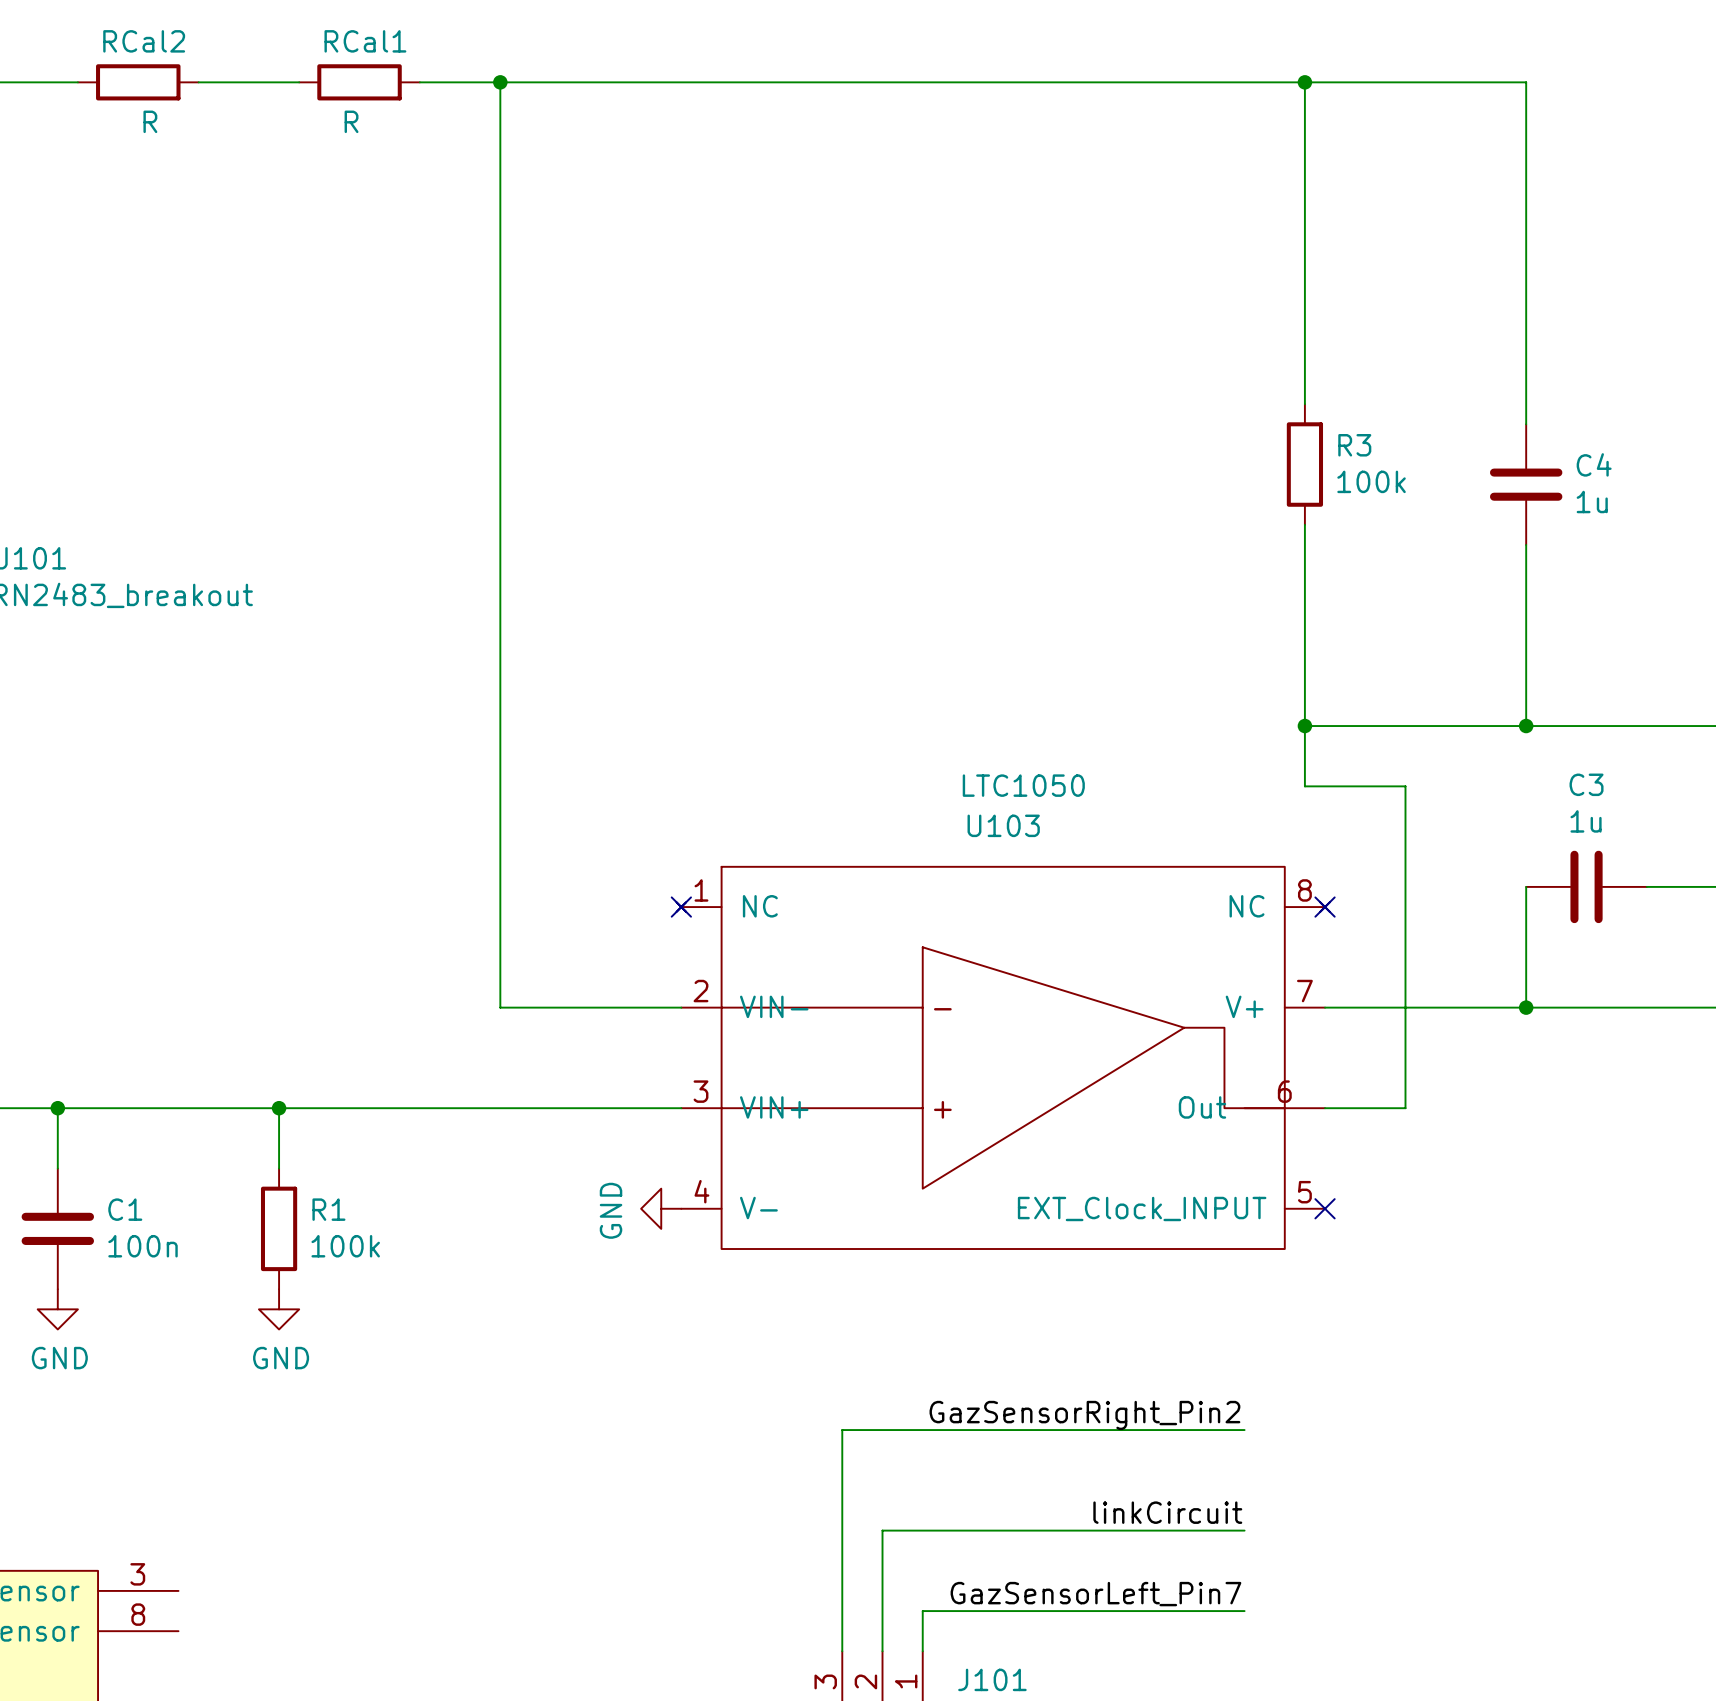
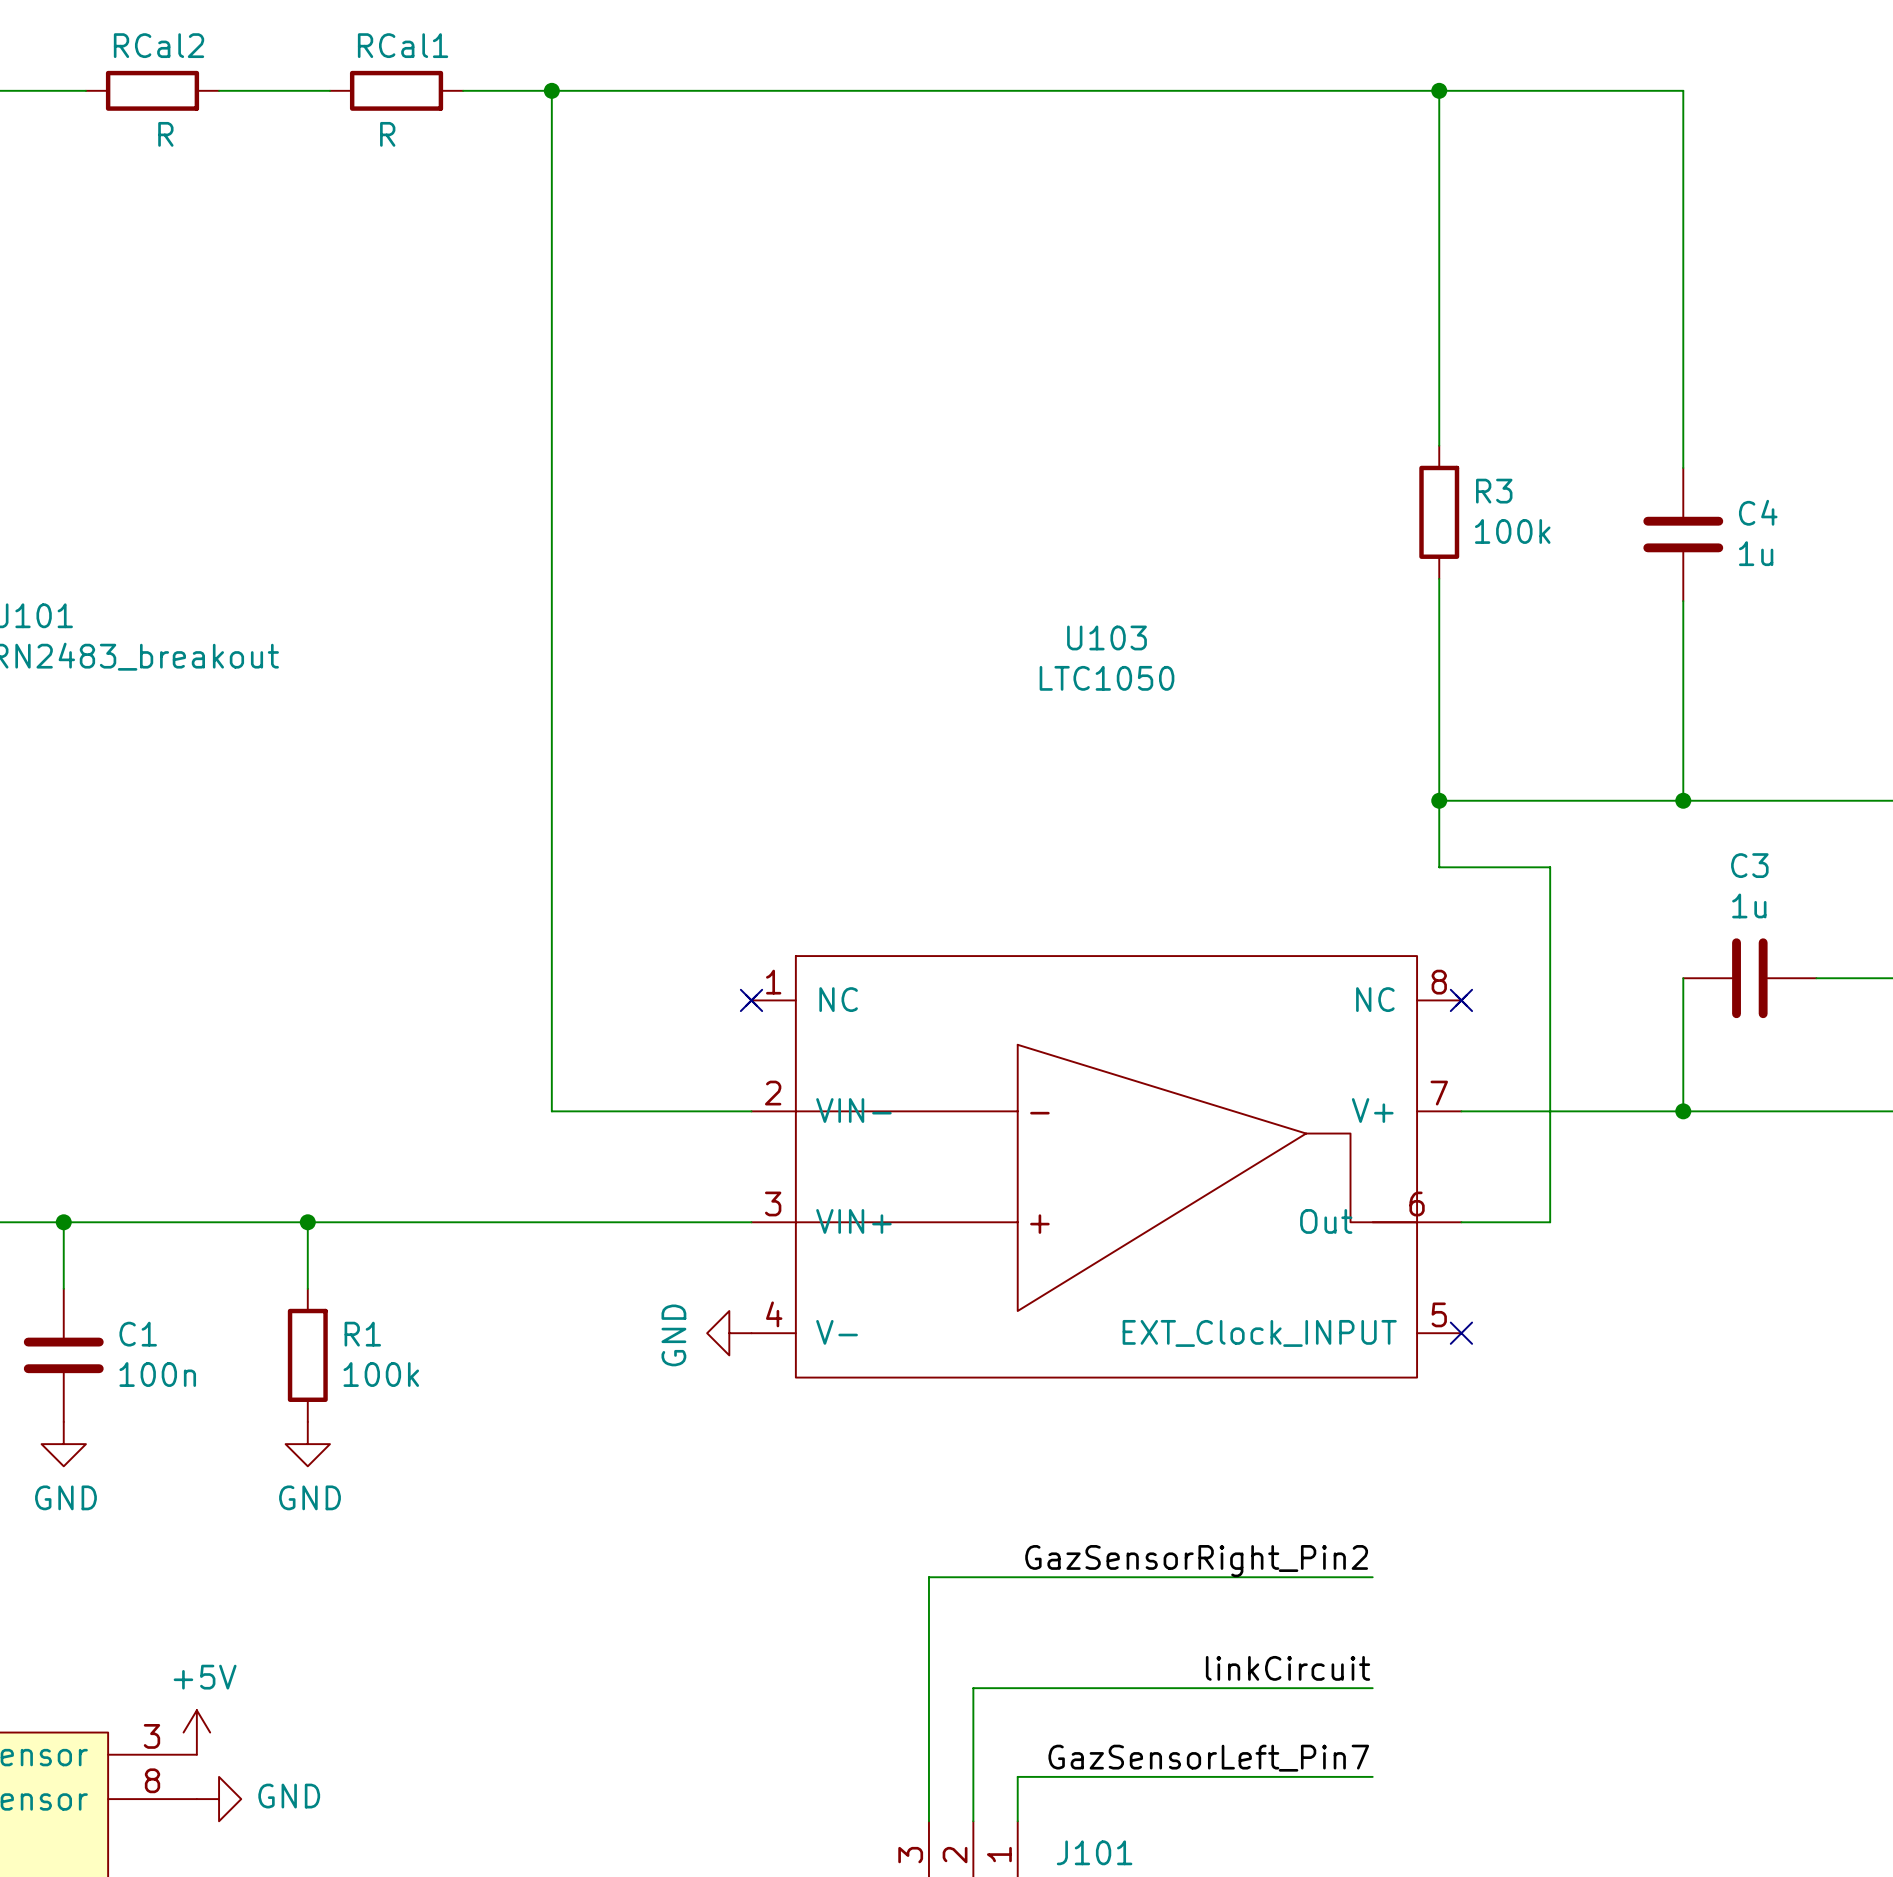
U103 value position: LTC1050 (1023, 785) -> LTC1050 (1106, 678)
U103 name position: U103 (1003, 825) -> U103 (1106, 637)
power symbol: none -> +5V (196, 1732)
power symbol: none -> GND (219, 1799)

